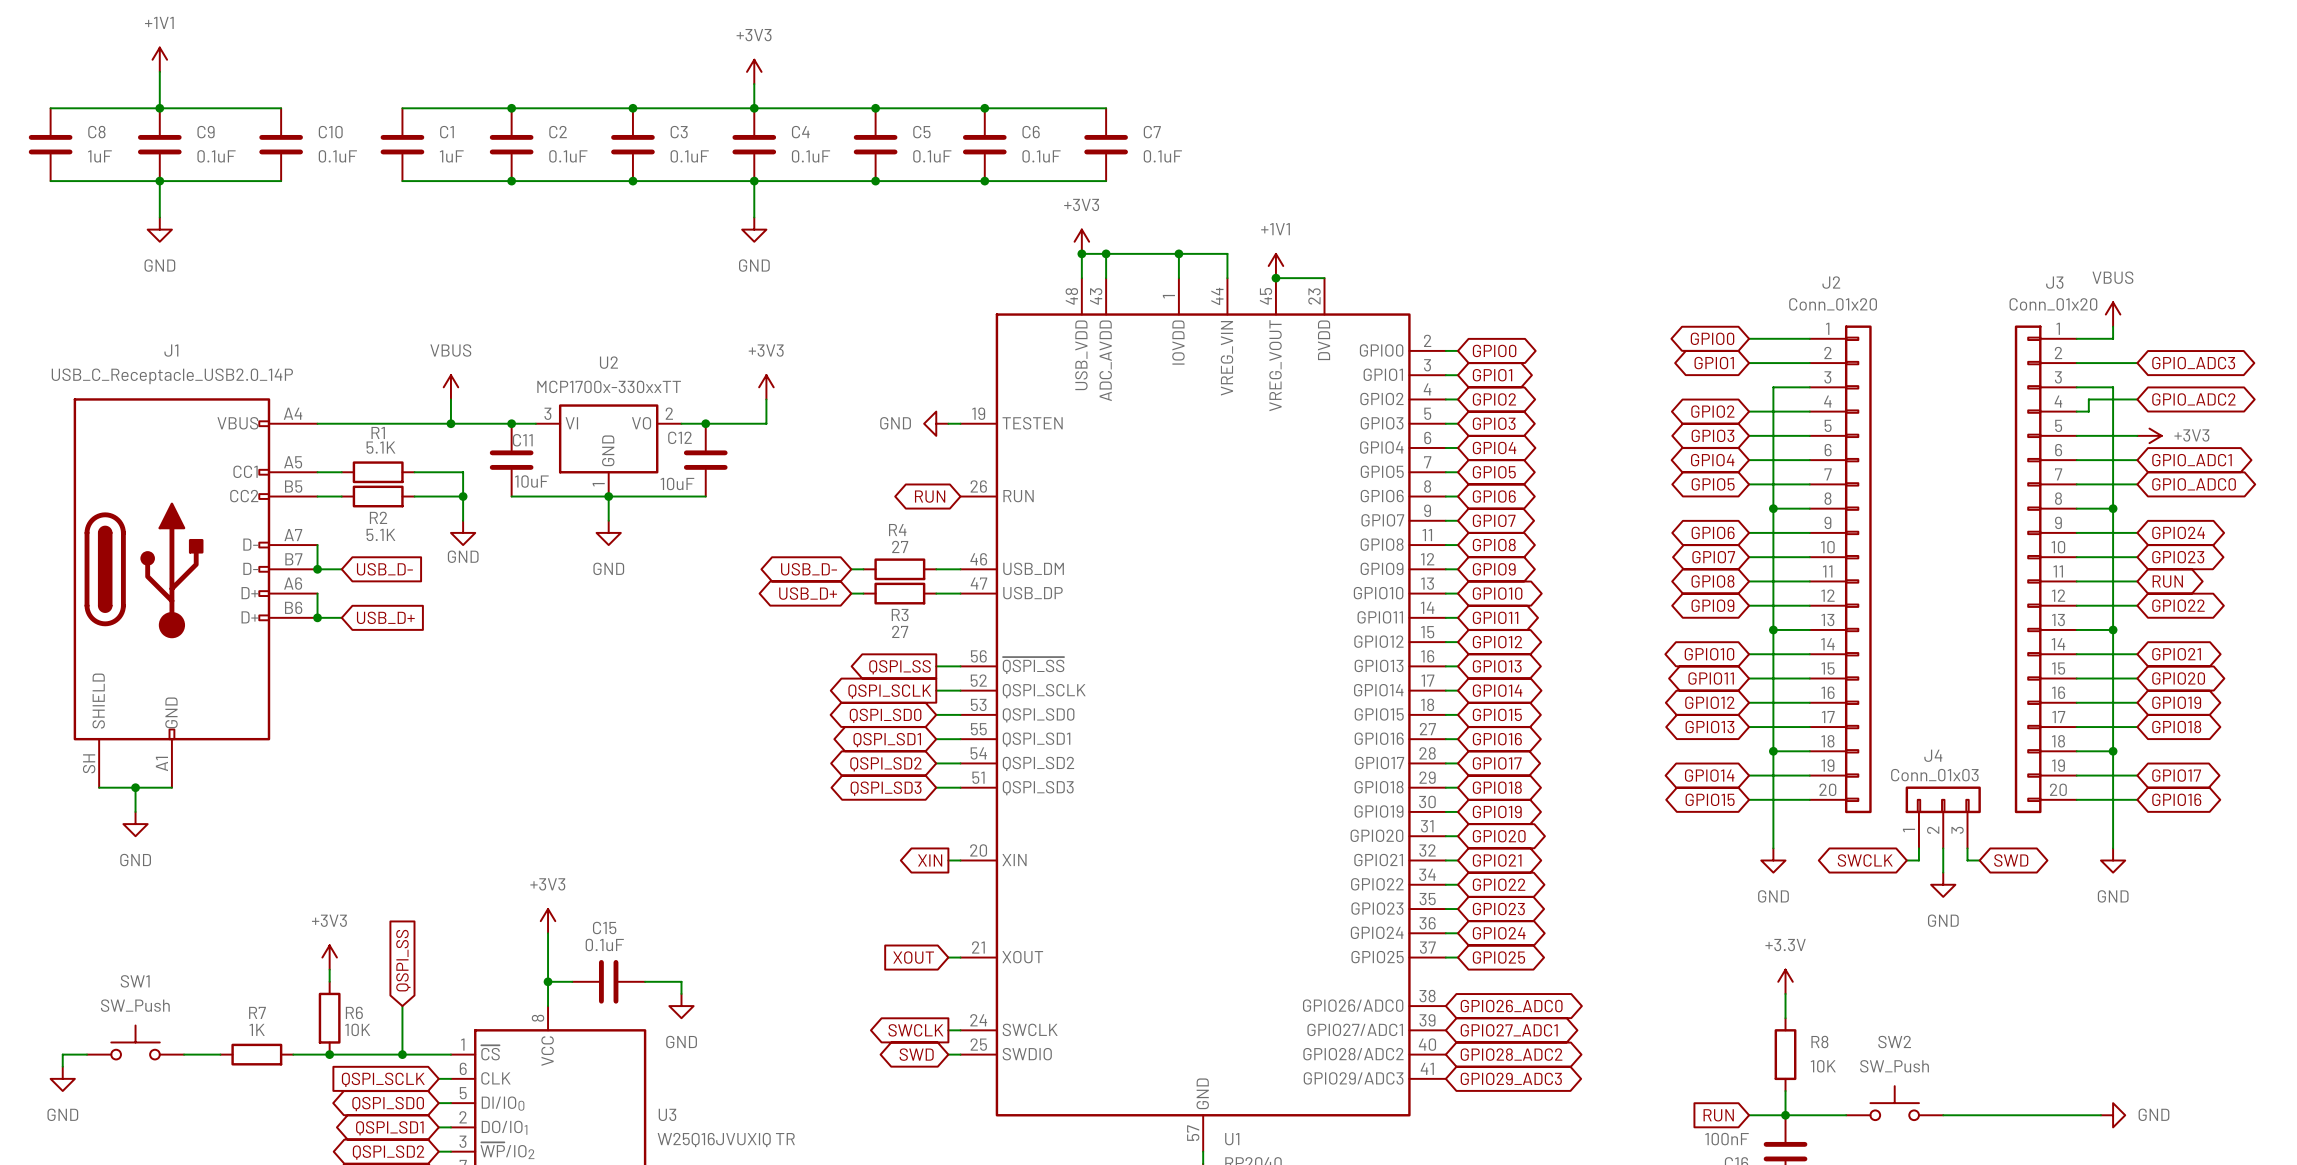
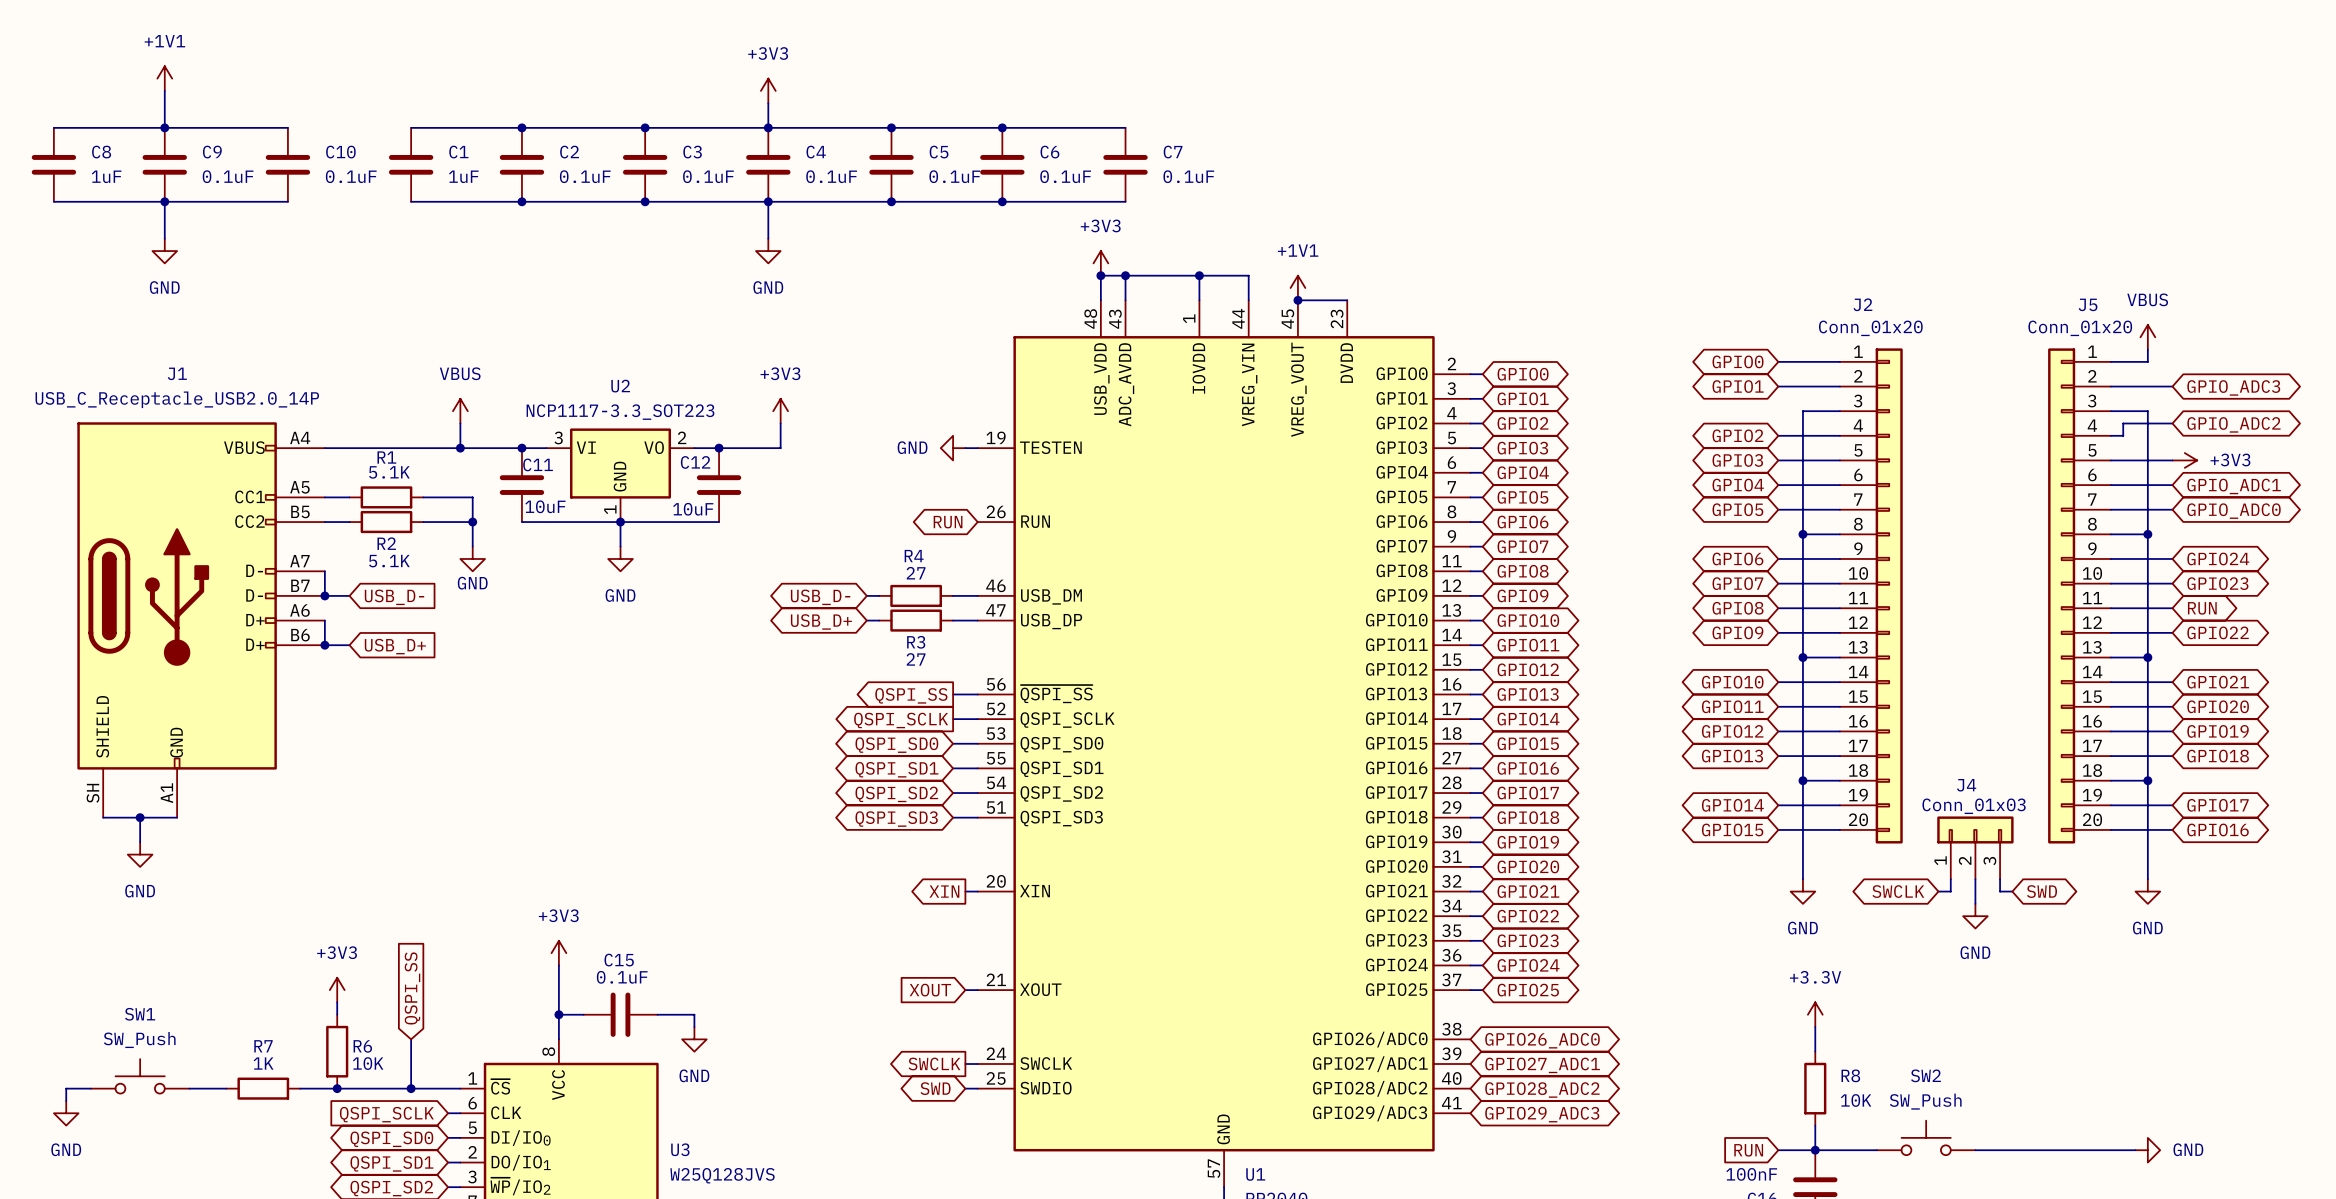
J3 name: J3 (2054, 282) -> J5 (2088, 304)
U2 value: MCP1700x-330xxTT (609, 386) -> NCP1117-3.3_SOT223 (620, 412)
U3 value: W25Q16JVUXIQ TR (726, 1140) -> W25Q128JVS (722, 1175)

